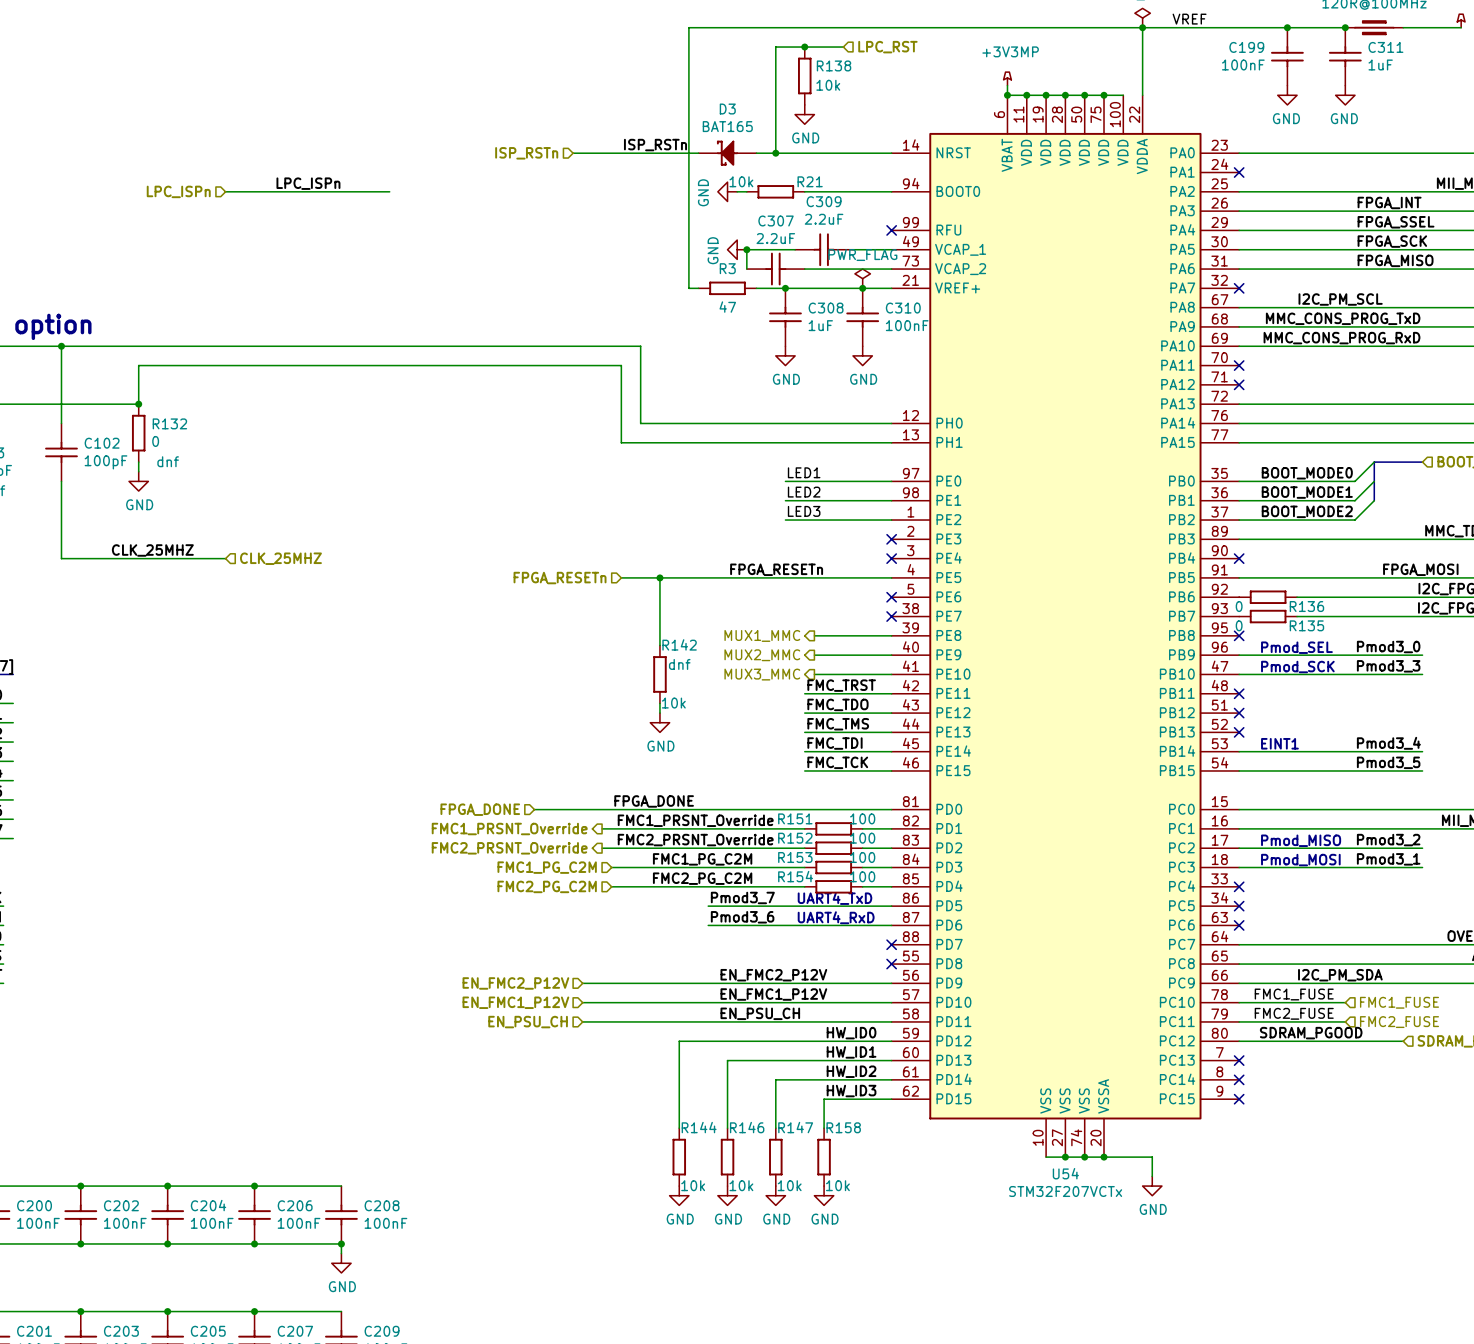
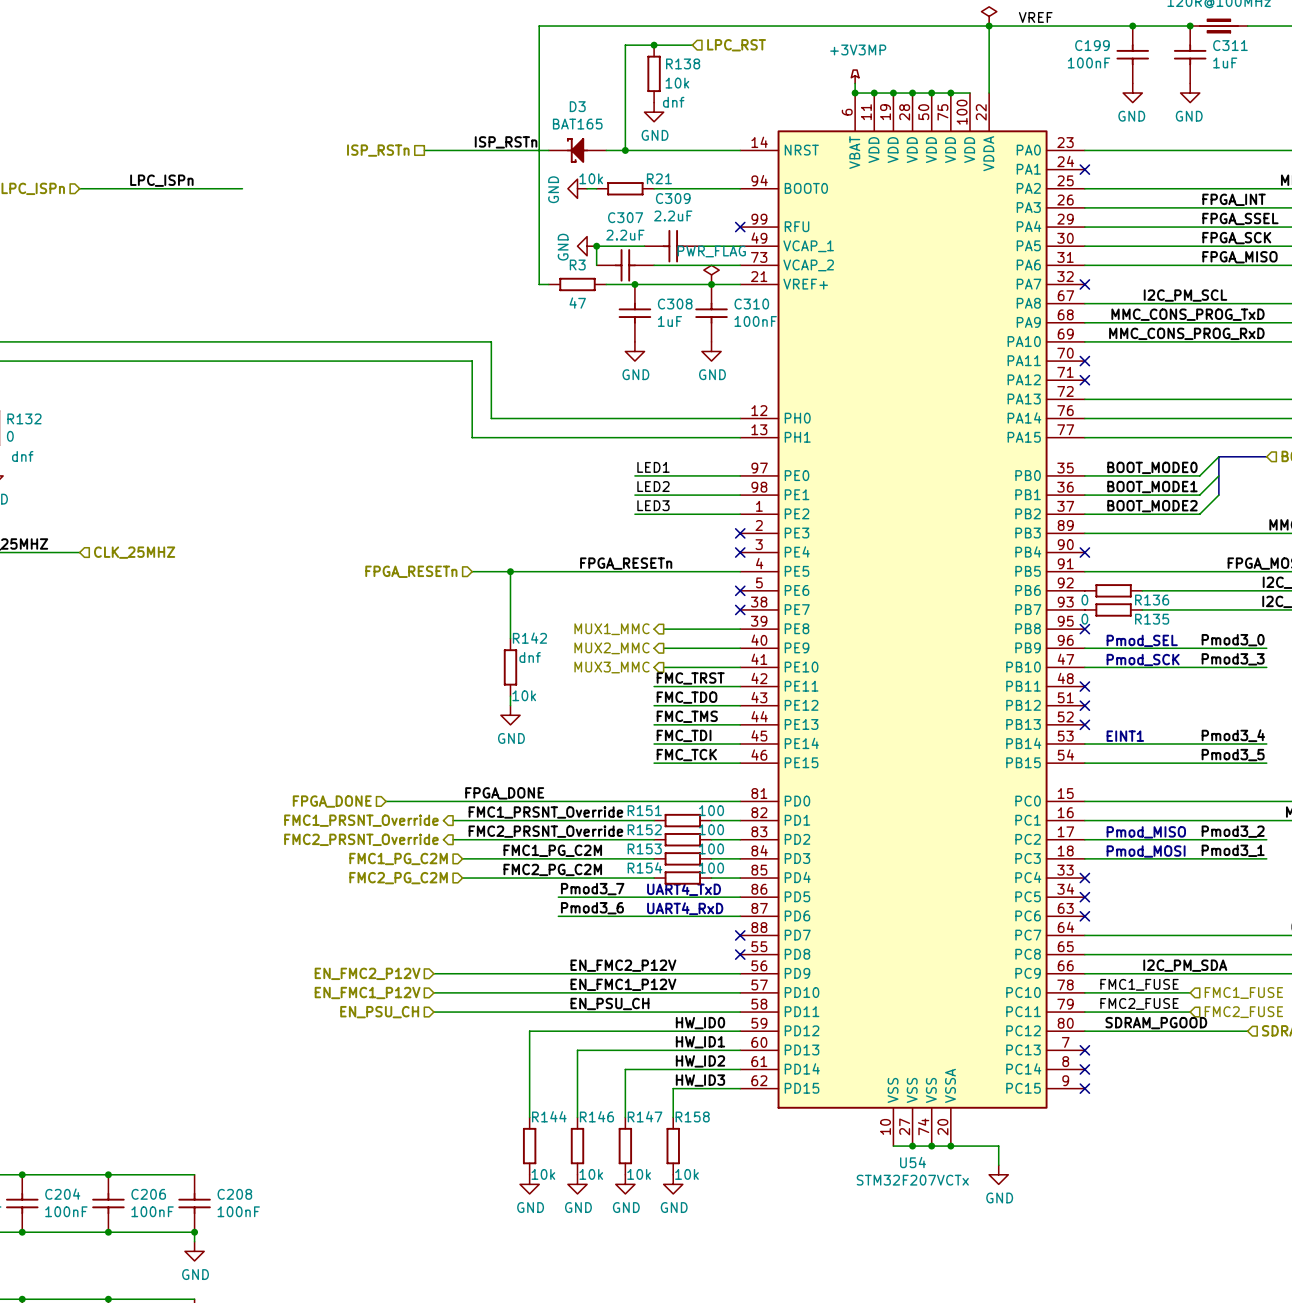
R138 text: none -> dnf (673, 102)
hierarchical label shape: input (526, 153) -> passive (378, 150)

